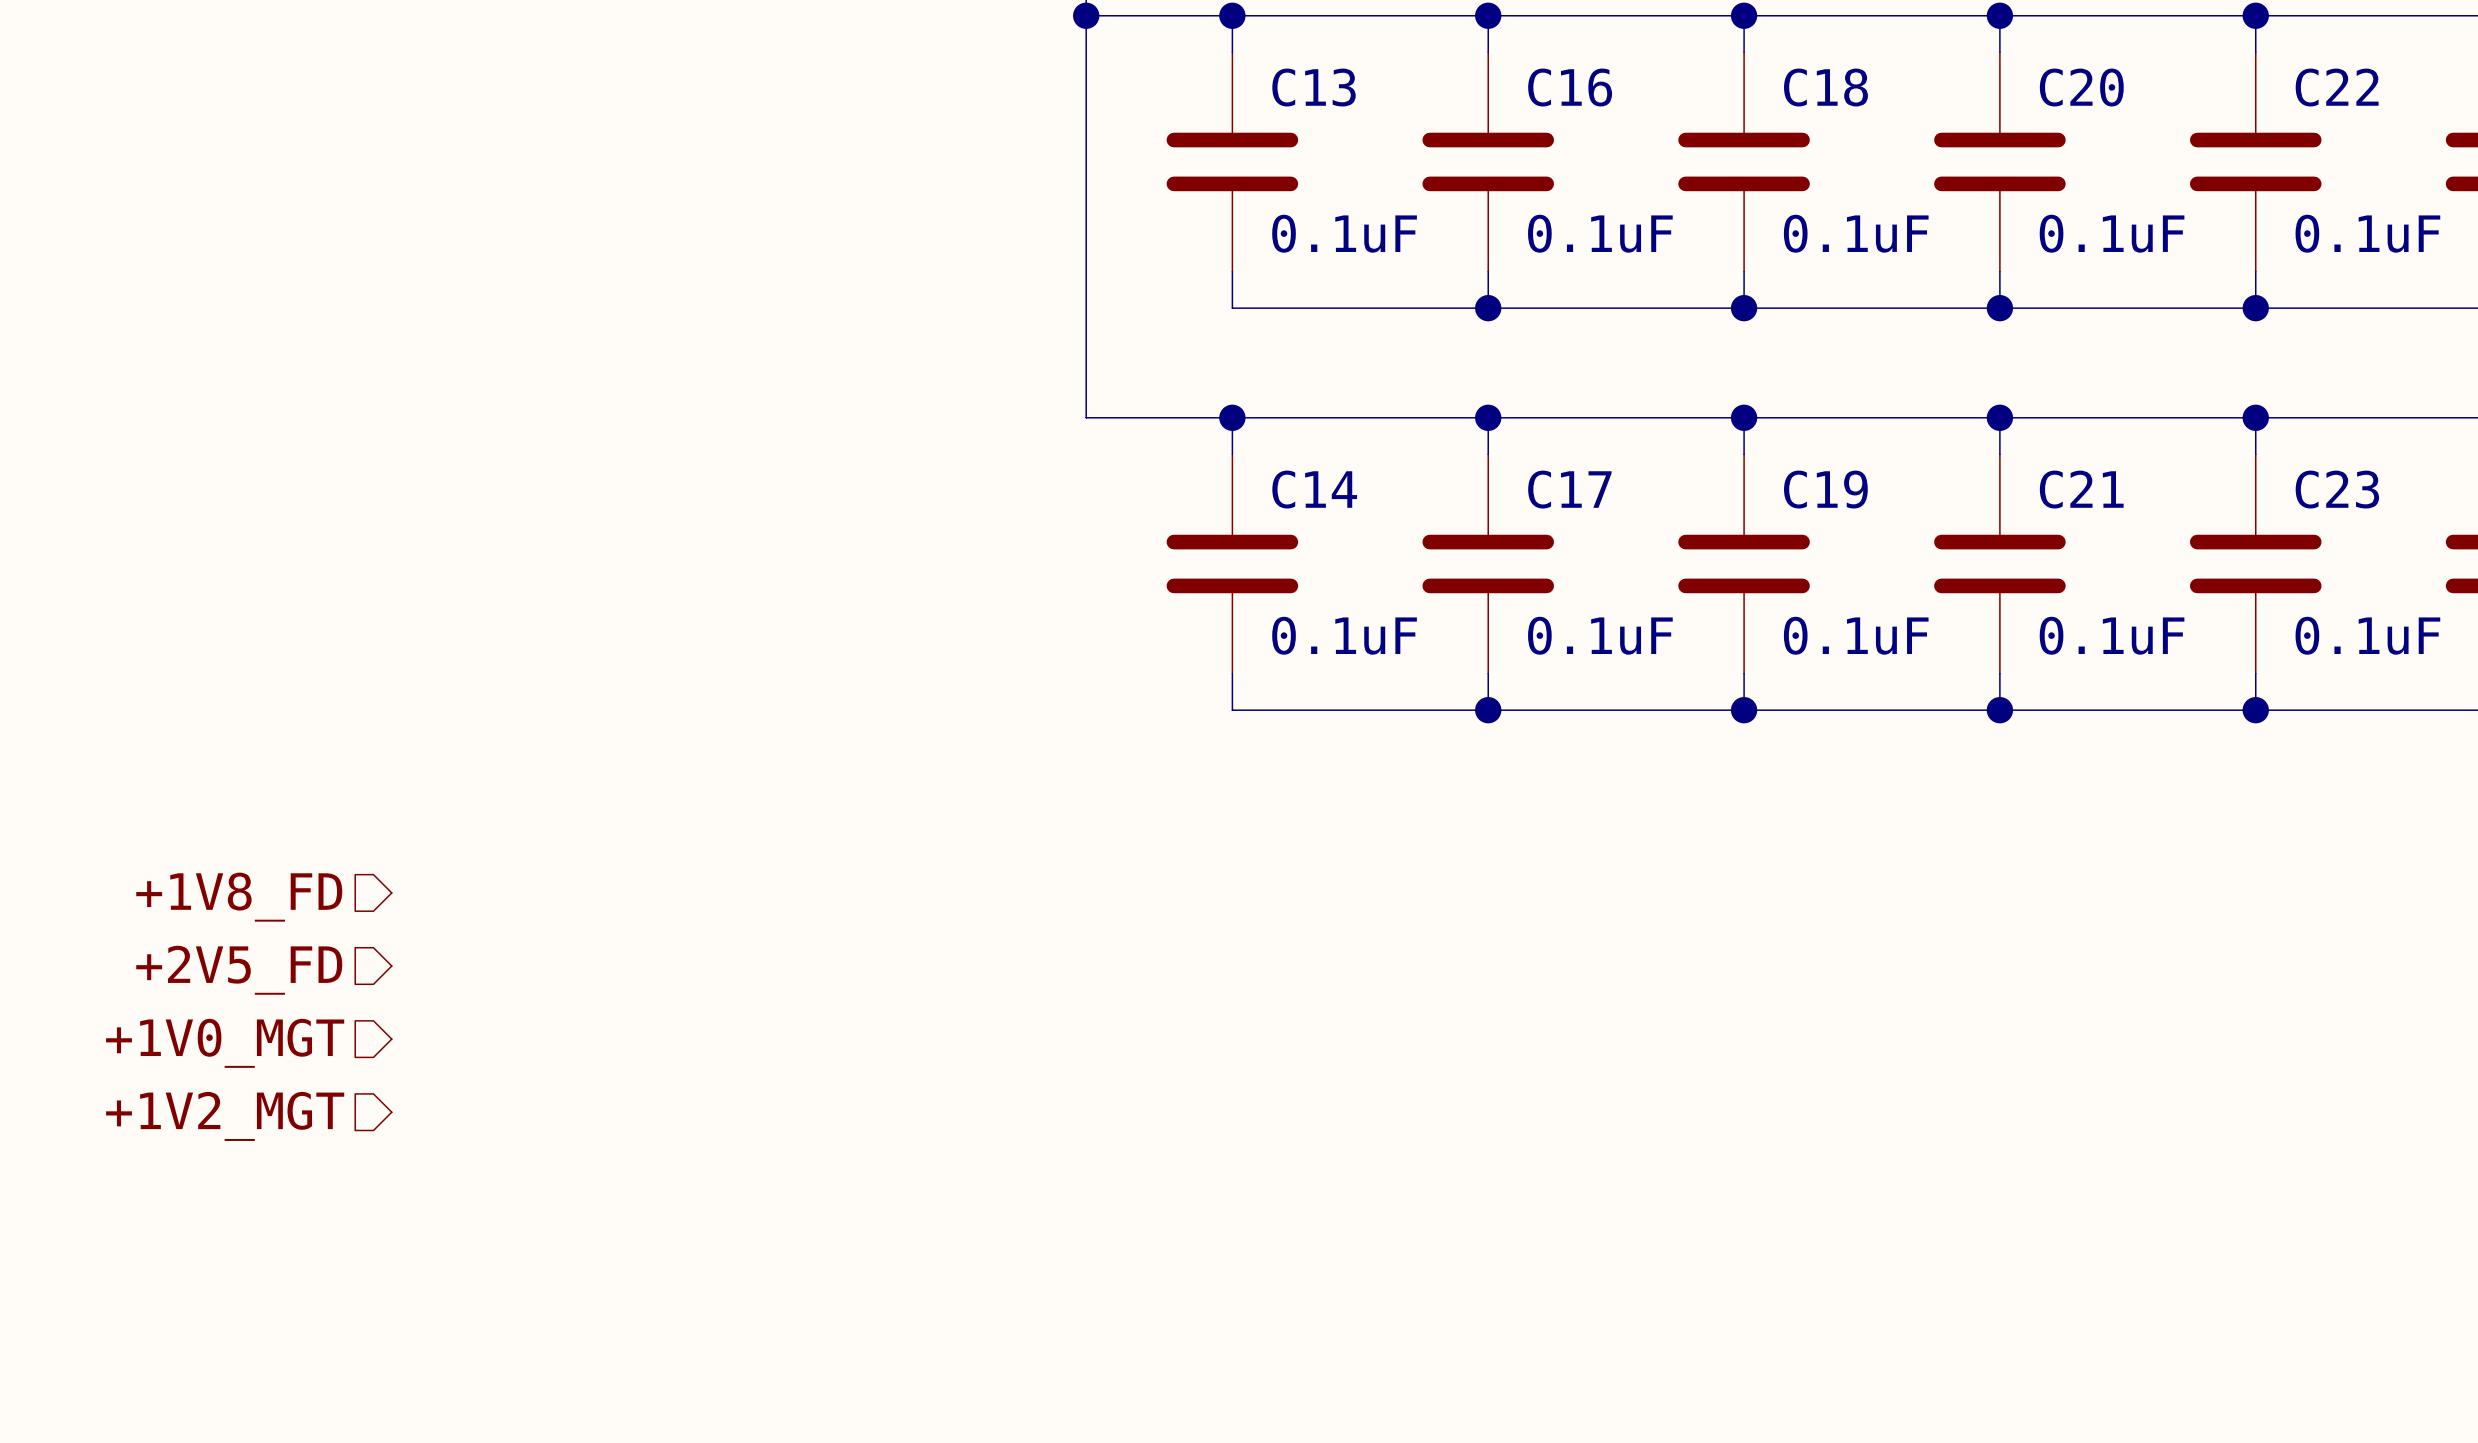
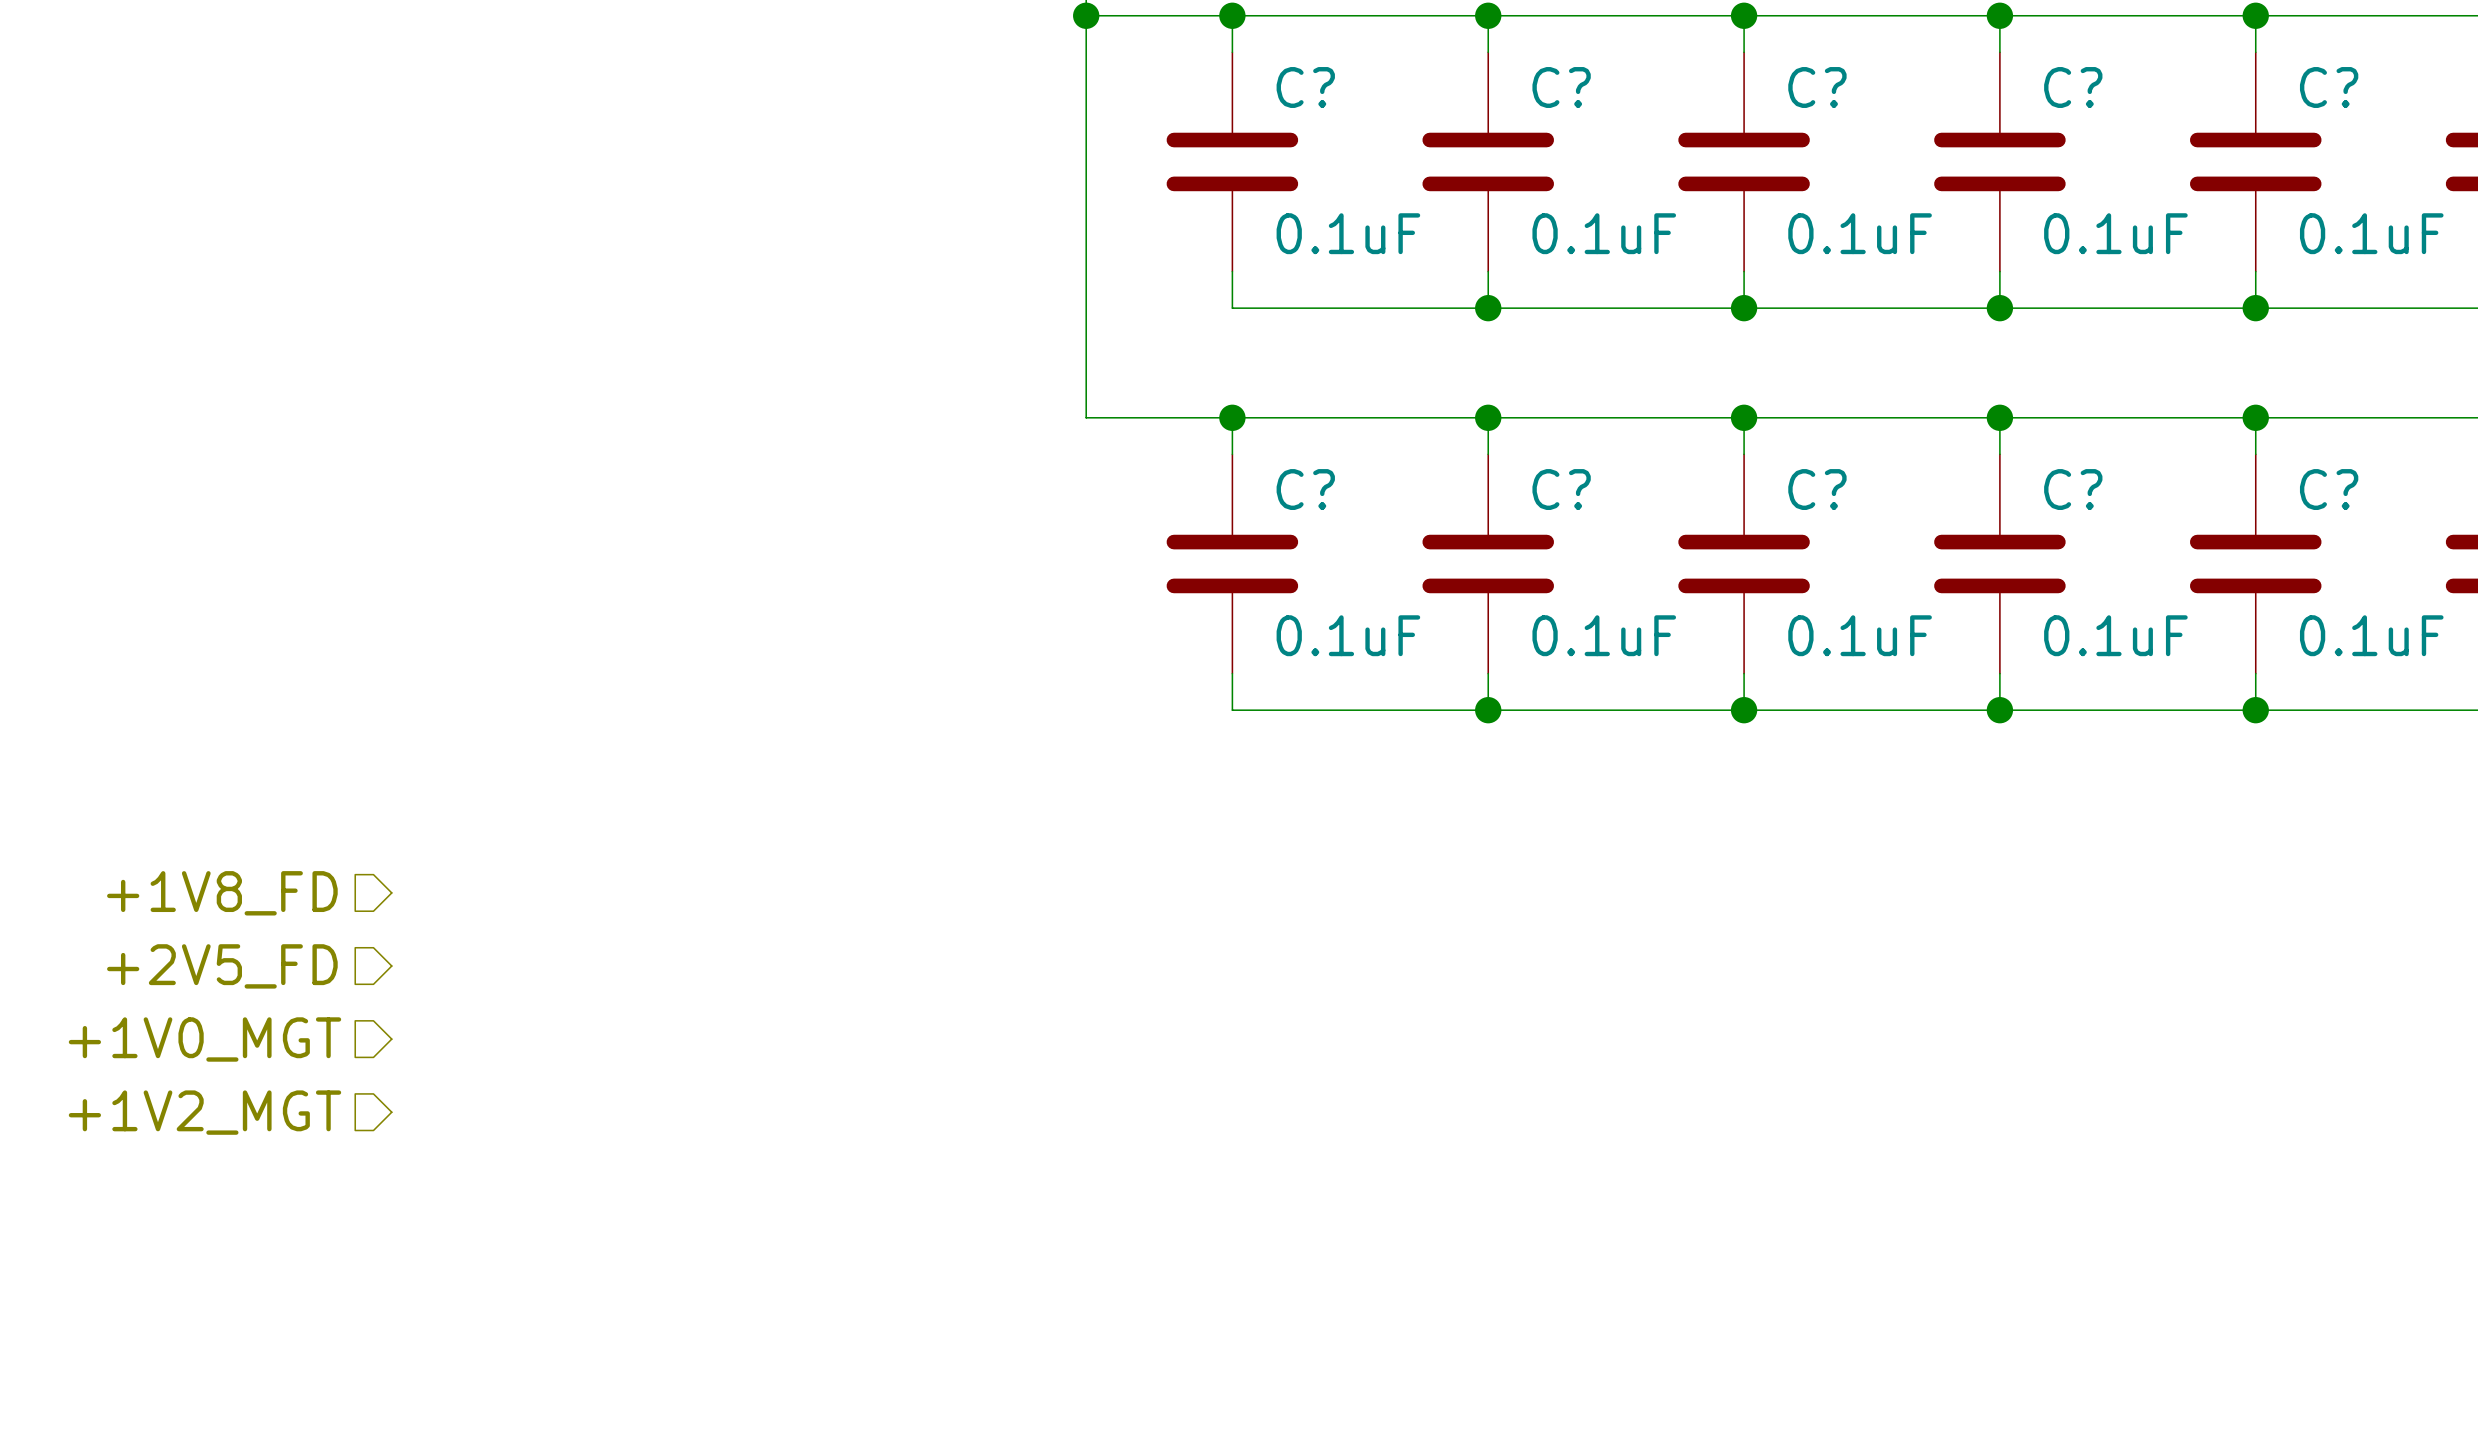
C13 name: C13 (1314, 87) -> C? (1305, 87)
C16 name: C16 (1570, 87) -> C? (1561, 87)
C18 name: C18 (1825, 87) -> C? (1817, 87)
C20 name: C20 (2081, 87) -> C? (2073, 87)
C22 name: C22 (2337, 87) -> C? (2329, 87)
C14 name: C14 (1314, 489) -> C? (1305, 489)
C17 name: C17 (1569, 489) -> C? (1561, 489)
C19 name: C19 (1825, 489) -> C? (1817, 489)
C21 name: C21 (2081, 489) -> C? (2073, 489)
C23 name: C23 (2337, 489) -> C? (2329, 489)

